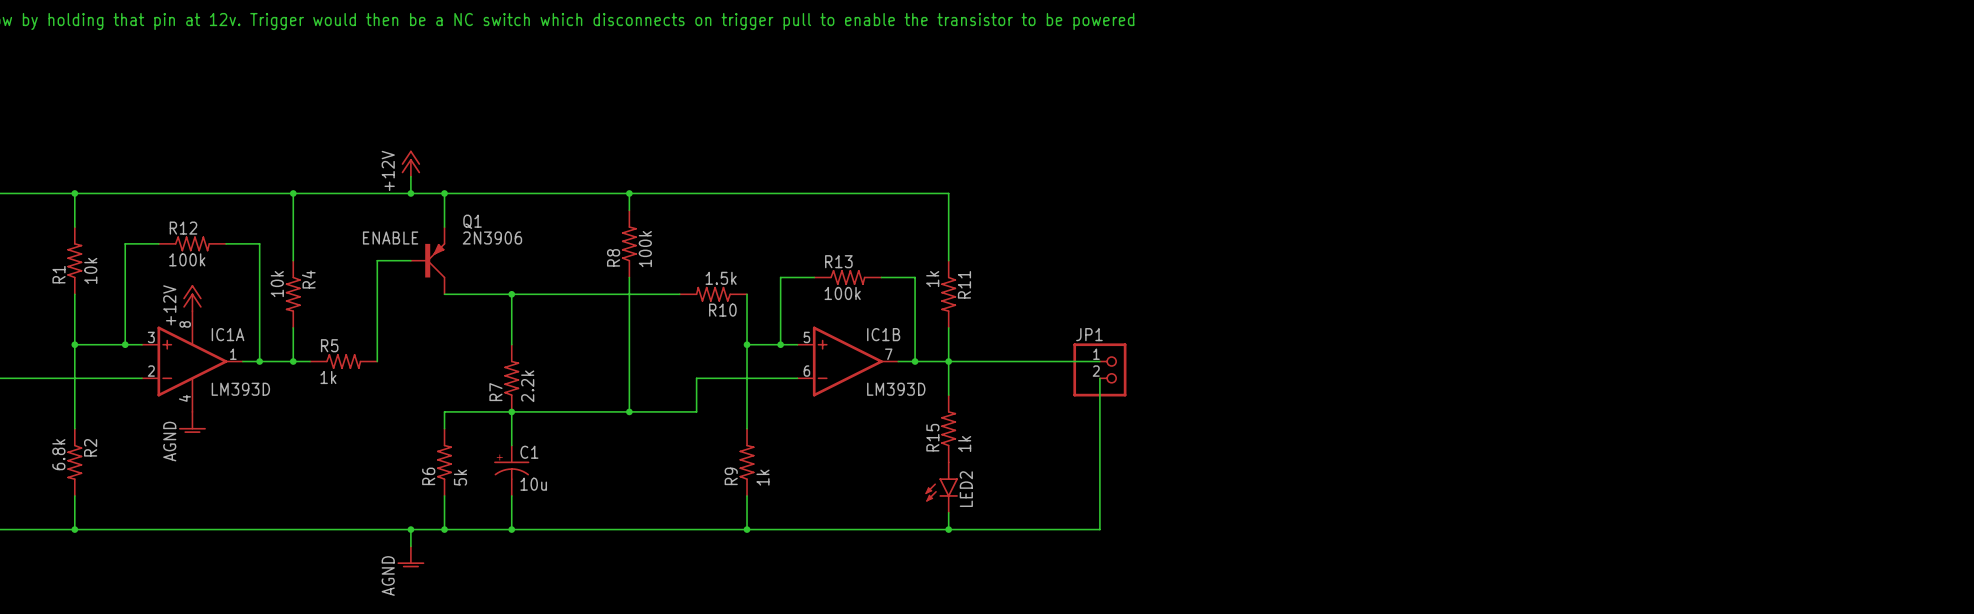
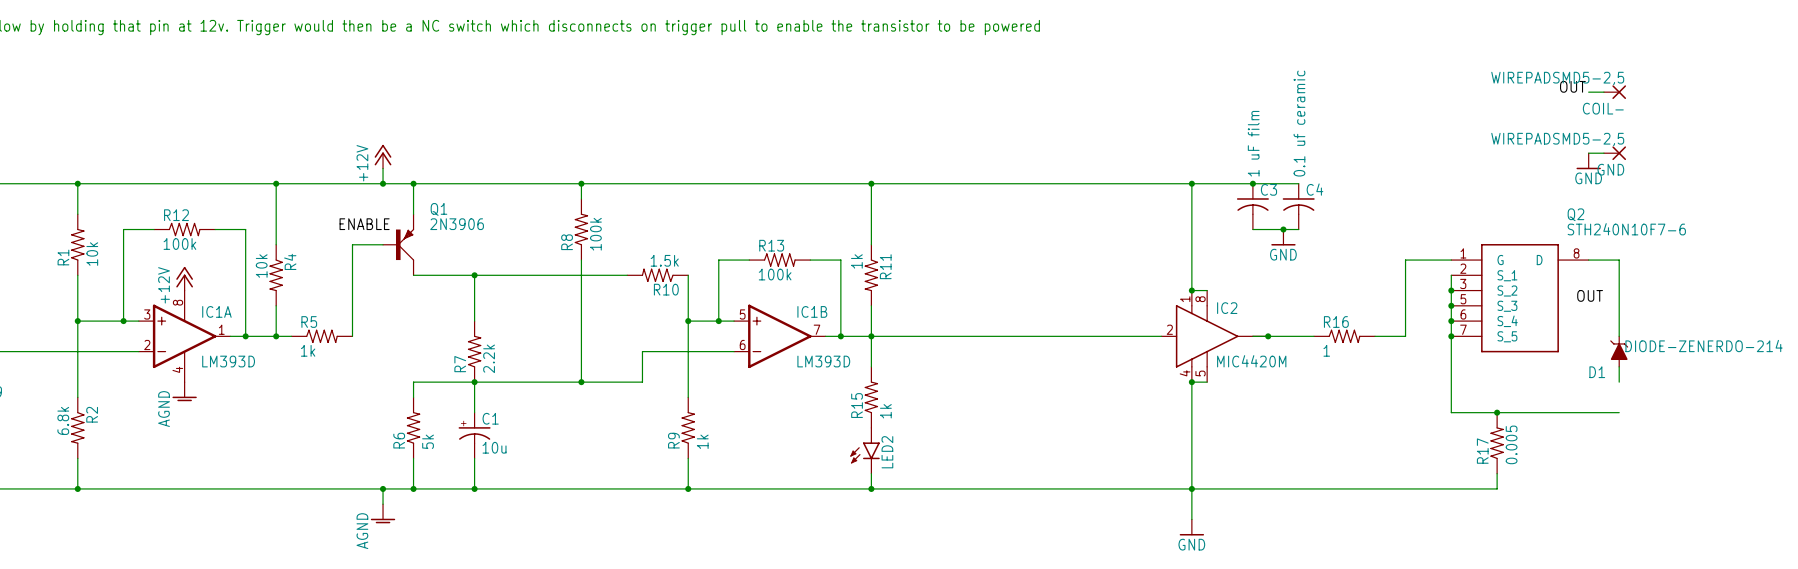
label: none -> OUT (1572, 86)
wire: none -> (1588, 92) (1603, 92)
COIL-: none -> WIREPADSMD5-2,5 (1615, 92)
wire: none -> (1588, 153) (1603, 153)
GND: none -> WIREPADSMD5-2,5 (1615, 153)
power symbol: none -> GND (1588, 161)
wire: none -> (871, 183) (1298, 183)
junction: none -> (871, 183)
wire: none -> (1191, 183) (1191, 290) (1207, 290)
junction: none -> (1191, 183)
junction: none -> (1252, 183)
C3: none -> 1 uF film (1252, 206)
C4: none -> 0.1 uf ceramic (1298, 206)
wire: none -> (1252, 229) (1298, 229)
junction: none -> (1283, 229)
power symbol: none -> GND (1283, 237)
wire: none -> (1451, 260) (1405, 260) (1405, 336) (1375, 336)
wire: none -> (1588, 260) (1619, 260) (1619, 336)
wire: none -> (1451, 275) (1451, 412) (1619, 412)
junction: none -> (1191, 290)
junction: none -> (1451, 290)
label: none -> OUT (1590, 295)
Q2: none -> STH240N10F7-6 (1520, 298)
junction: none -> (1451, 305)
junction: none -> (1451, 321)
wire: none -> (1008, 336) (1161, 336)
IC2: none -> MIC4420M (1214, 336)
wire: none -> (1252, 336) (1313, 336)
junction: none -> (1268, 336)
R16: none -> 1 (1344, 336)
junction: none -> (1451, 336)
JP1: (1099, 369) -> none
wire: (1099, 378) (1099, 529) -> (1497, 473) (1497, 488) (1008, 488)
D1: none -> DIODE-ZENERDO-214 (1619, 351)
wire: none -> (1619, 366) (1619, 382)
junction: none -> (1191, 382)
wire: none -> (1207, 382) (1191, 382) (1191, 519)
junction: none -> (1497, 412)
R17: none -> 0.005 (1497, 443)
junction: none -> (1191, 488)
power symbol: none -> GND (1191, 527)

